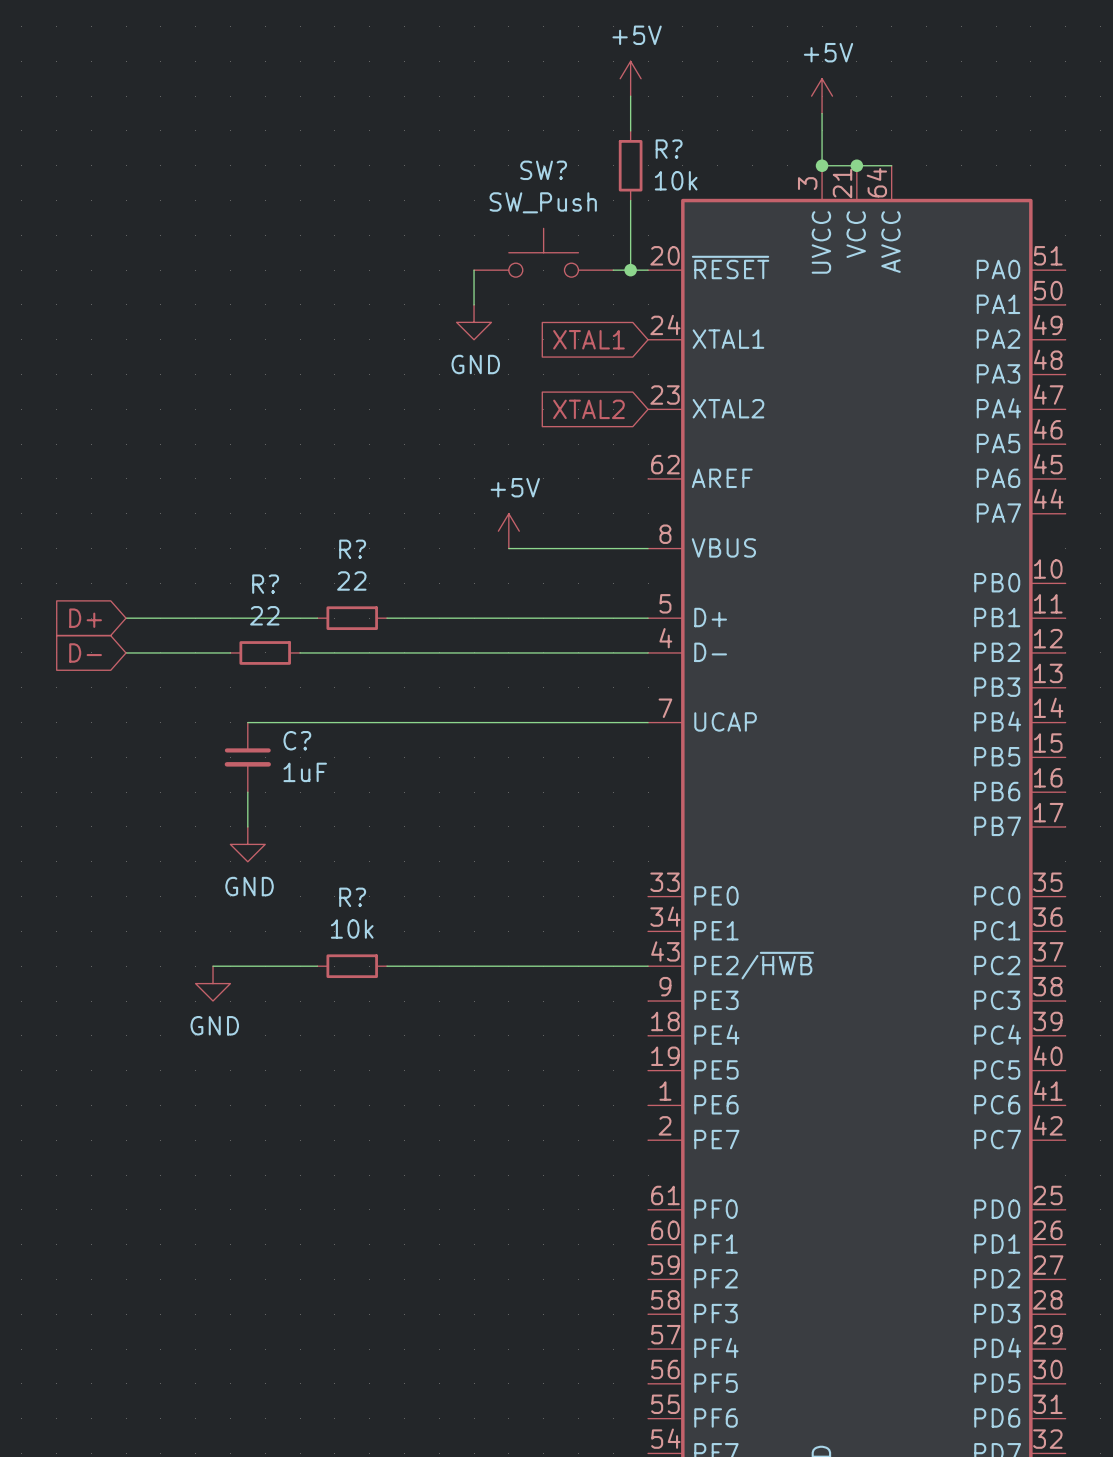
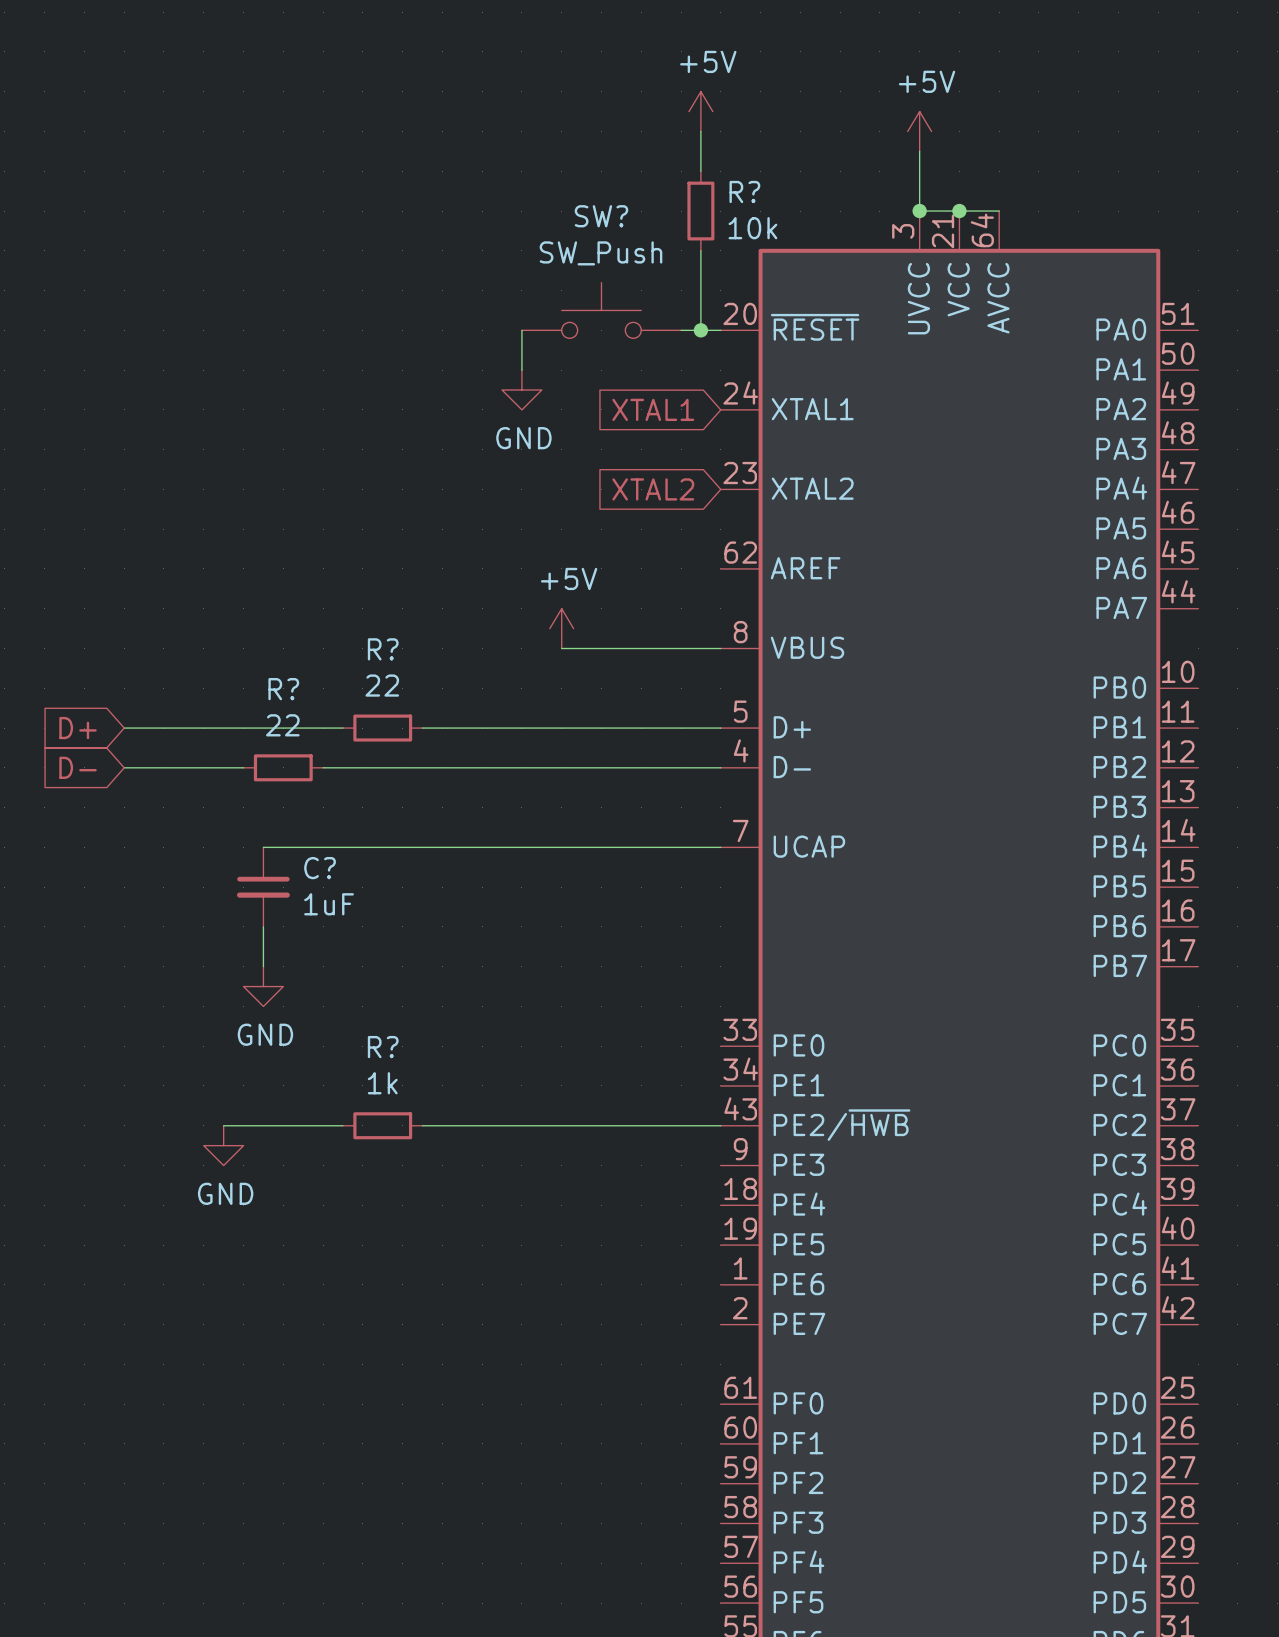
R? value: 10k (352, 929) -> 1k (382, 1083)

